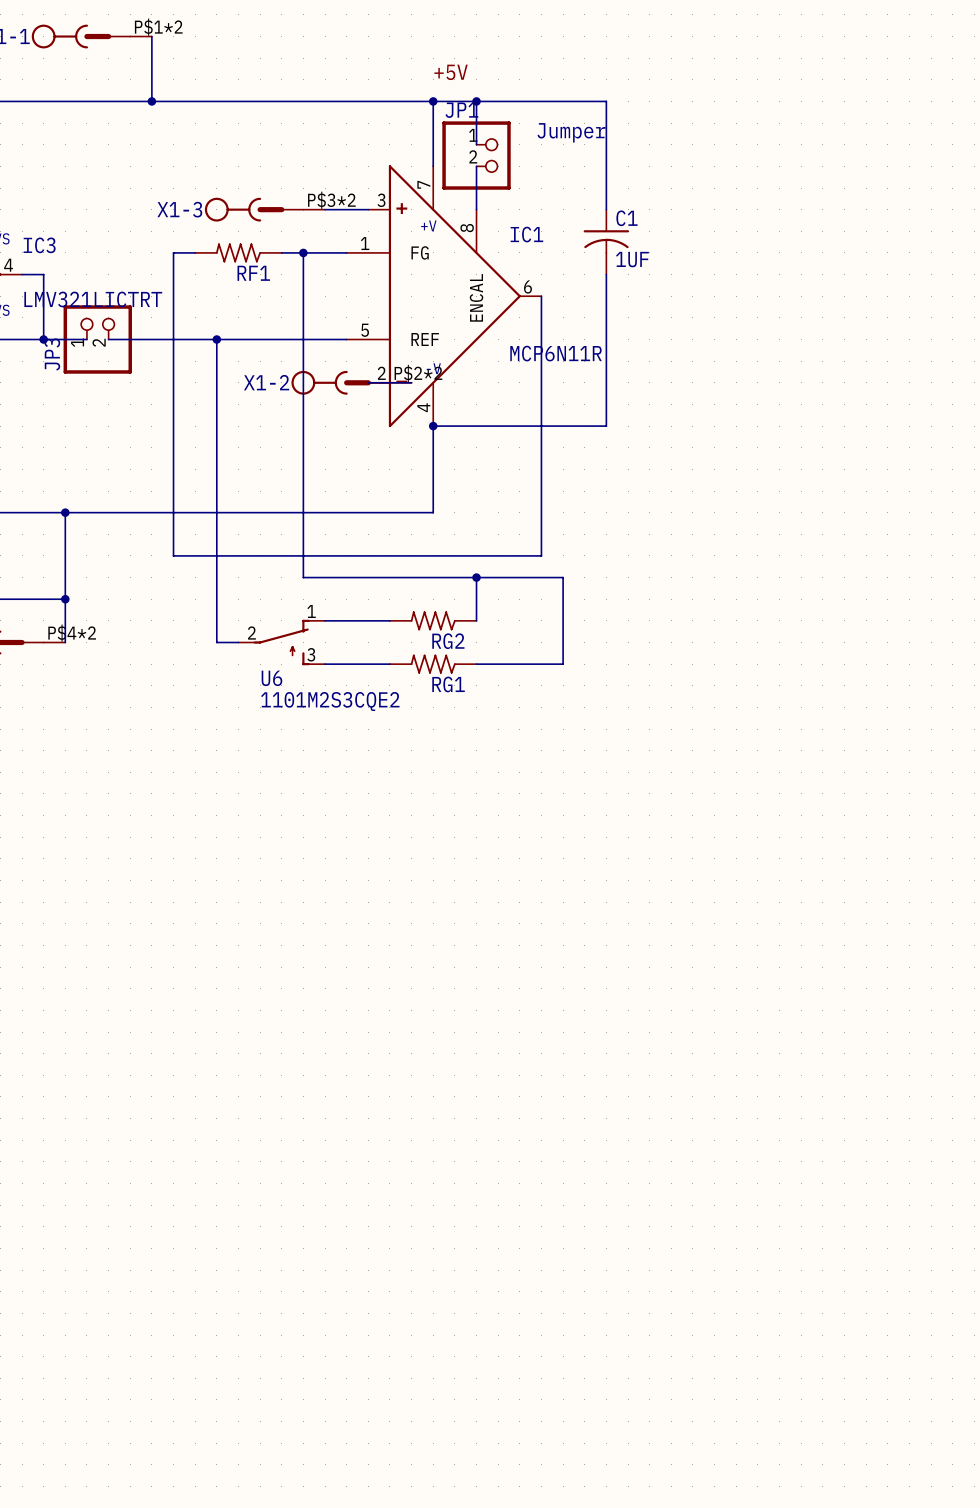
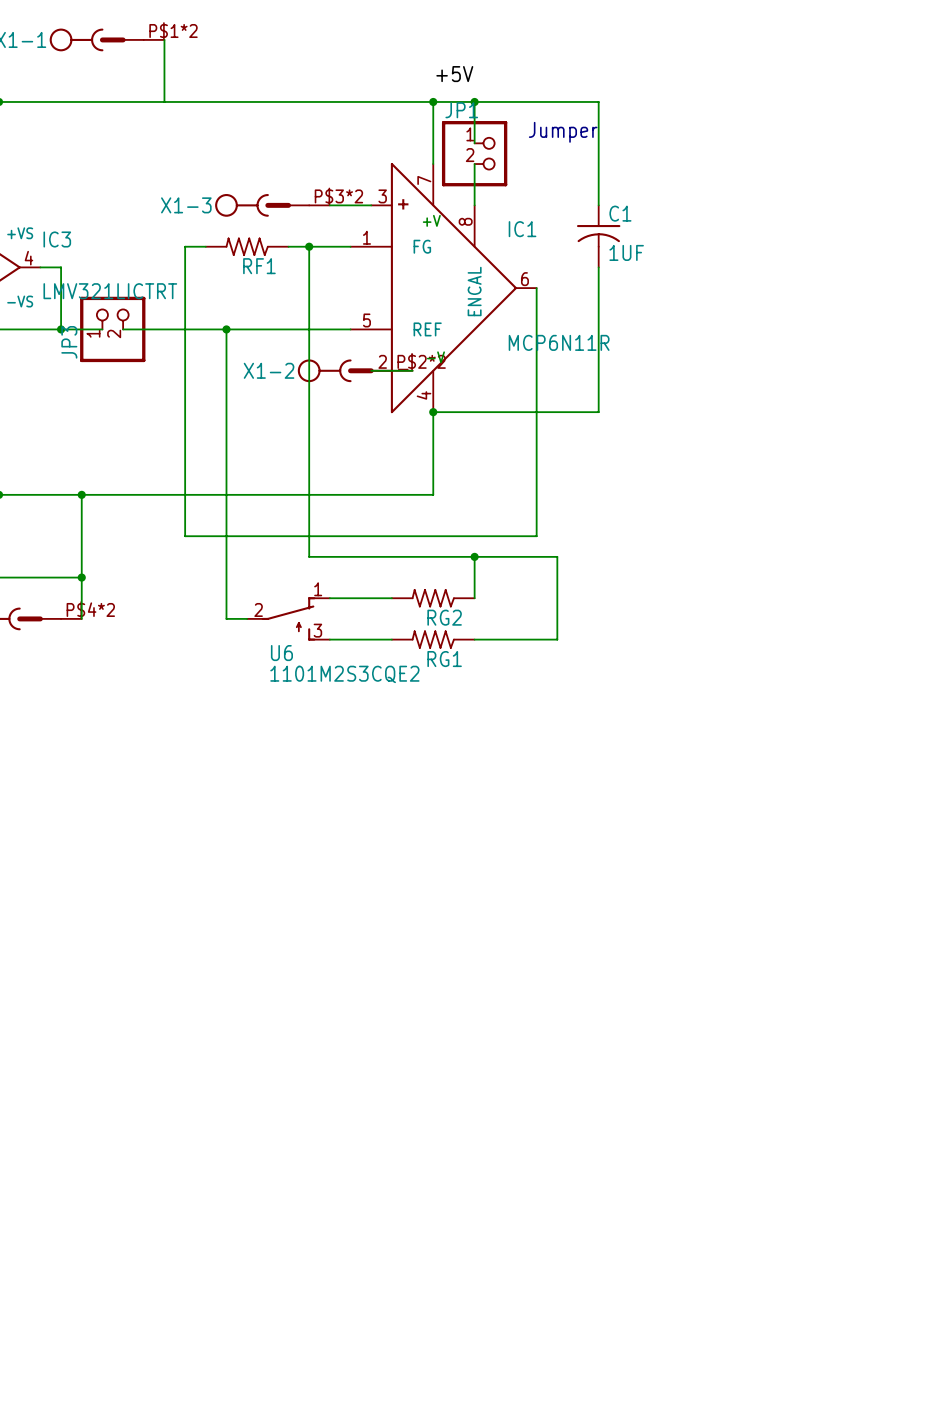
junction: (151, 101) -> none

